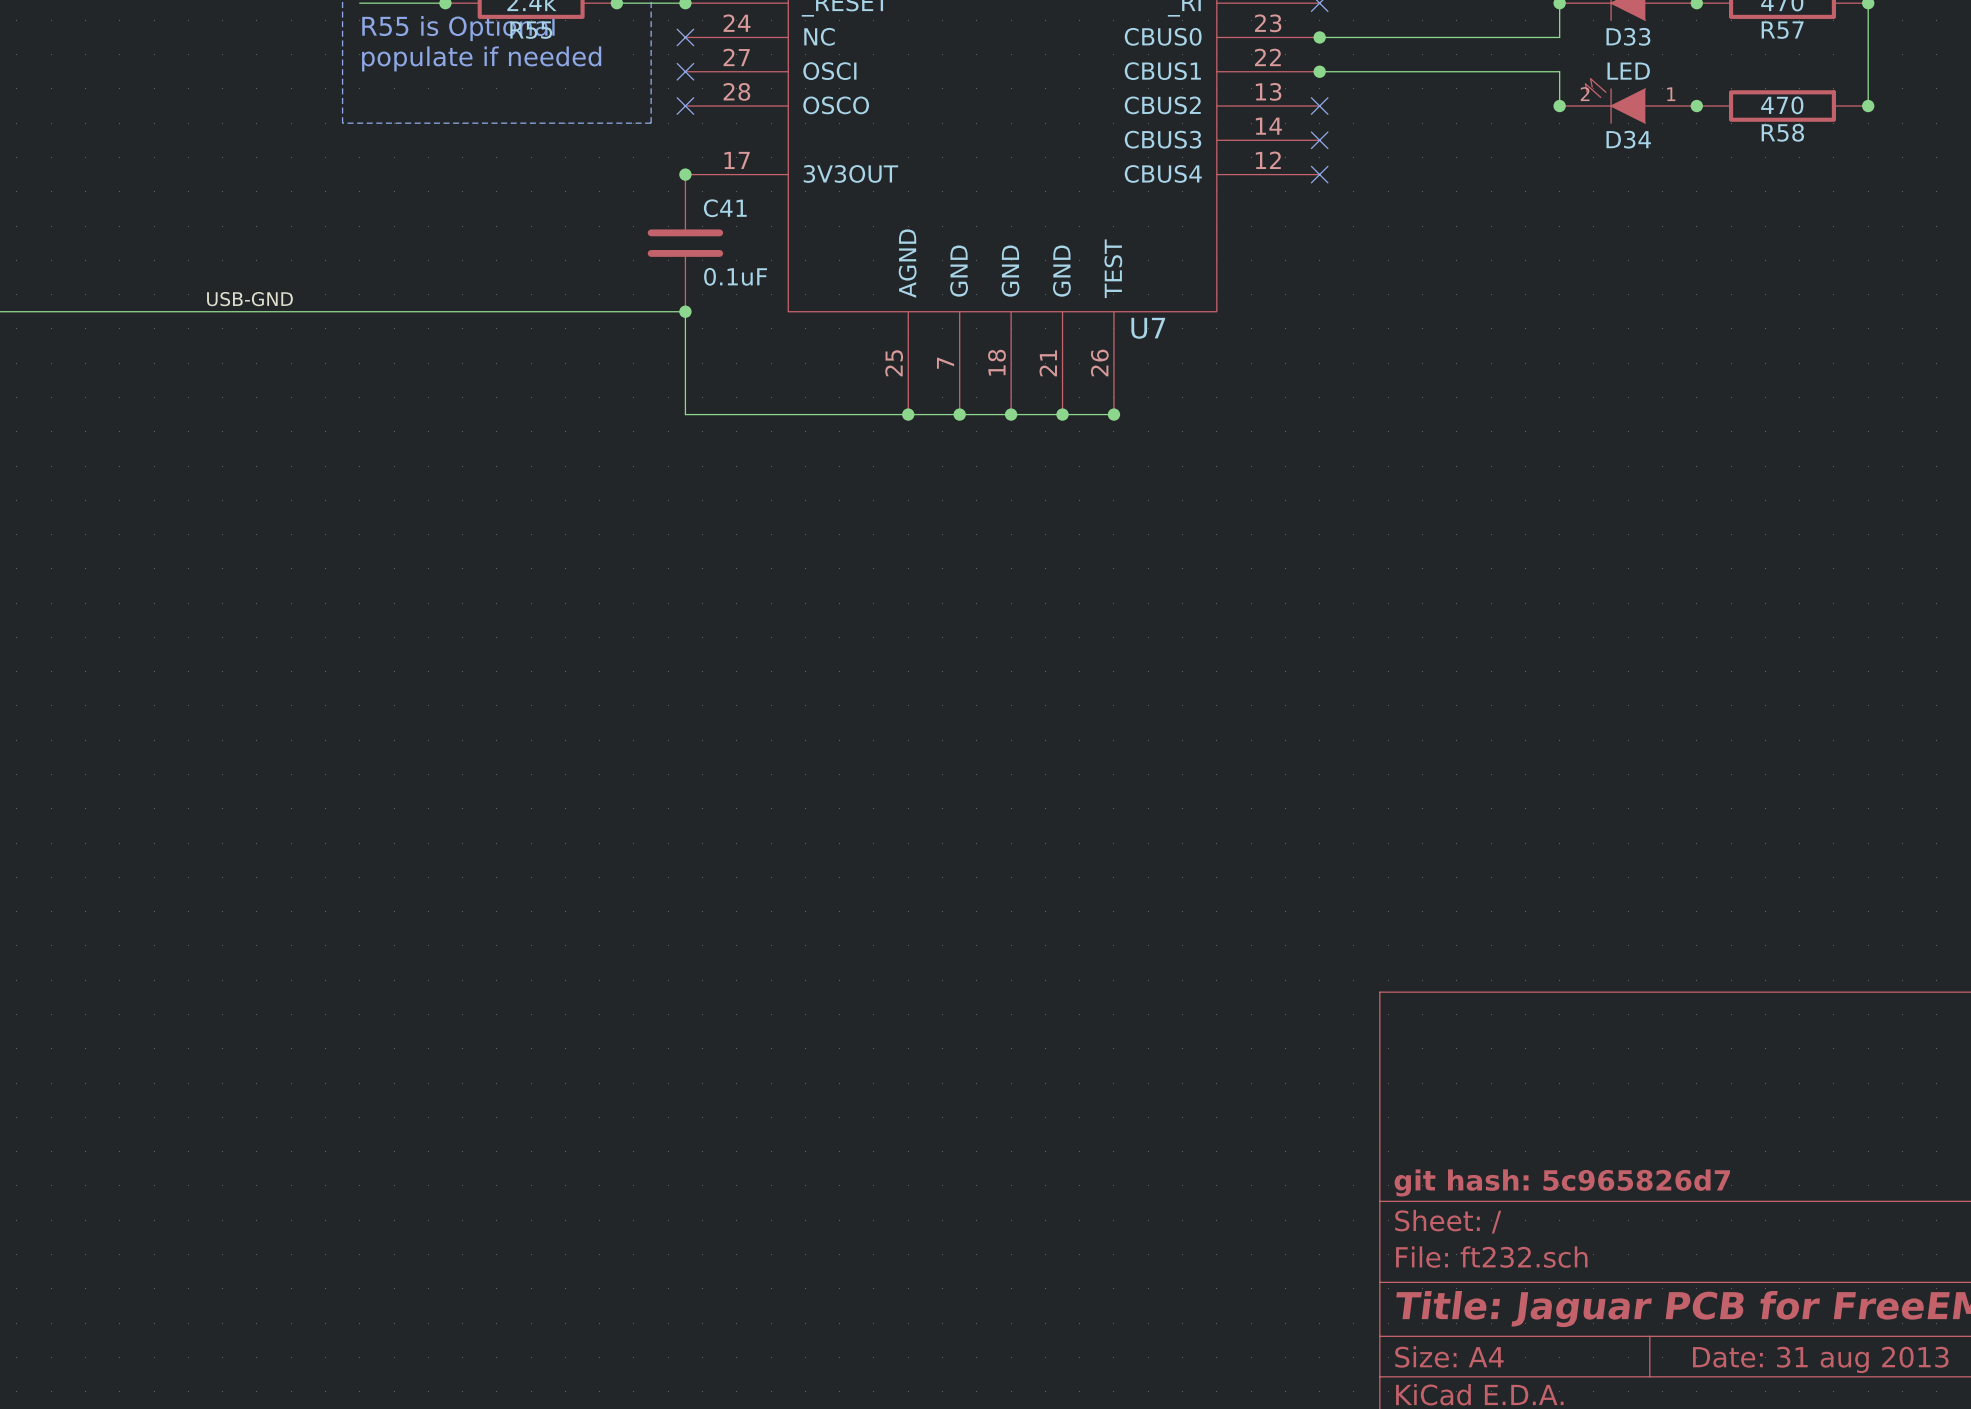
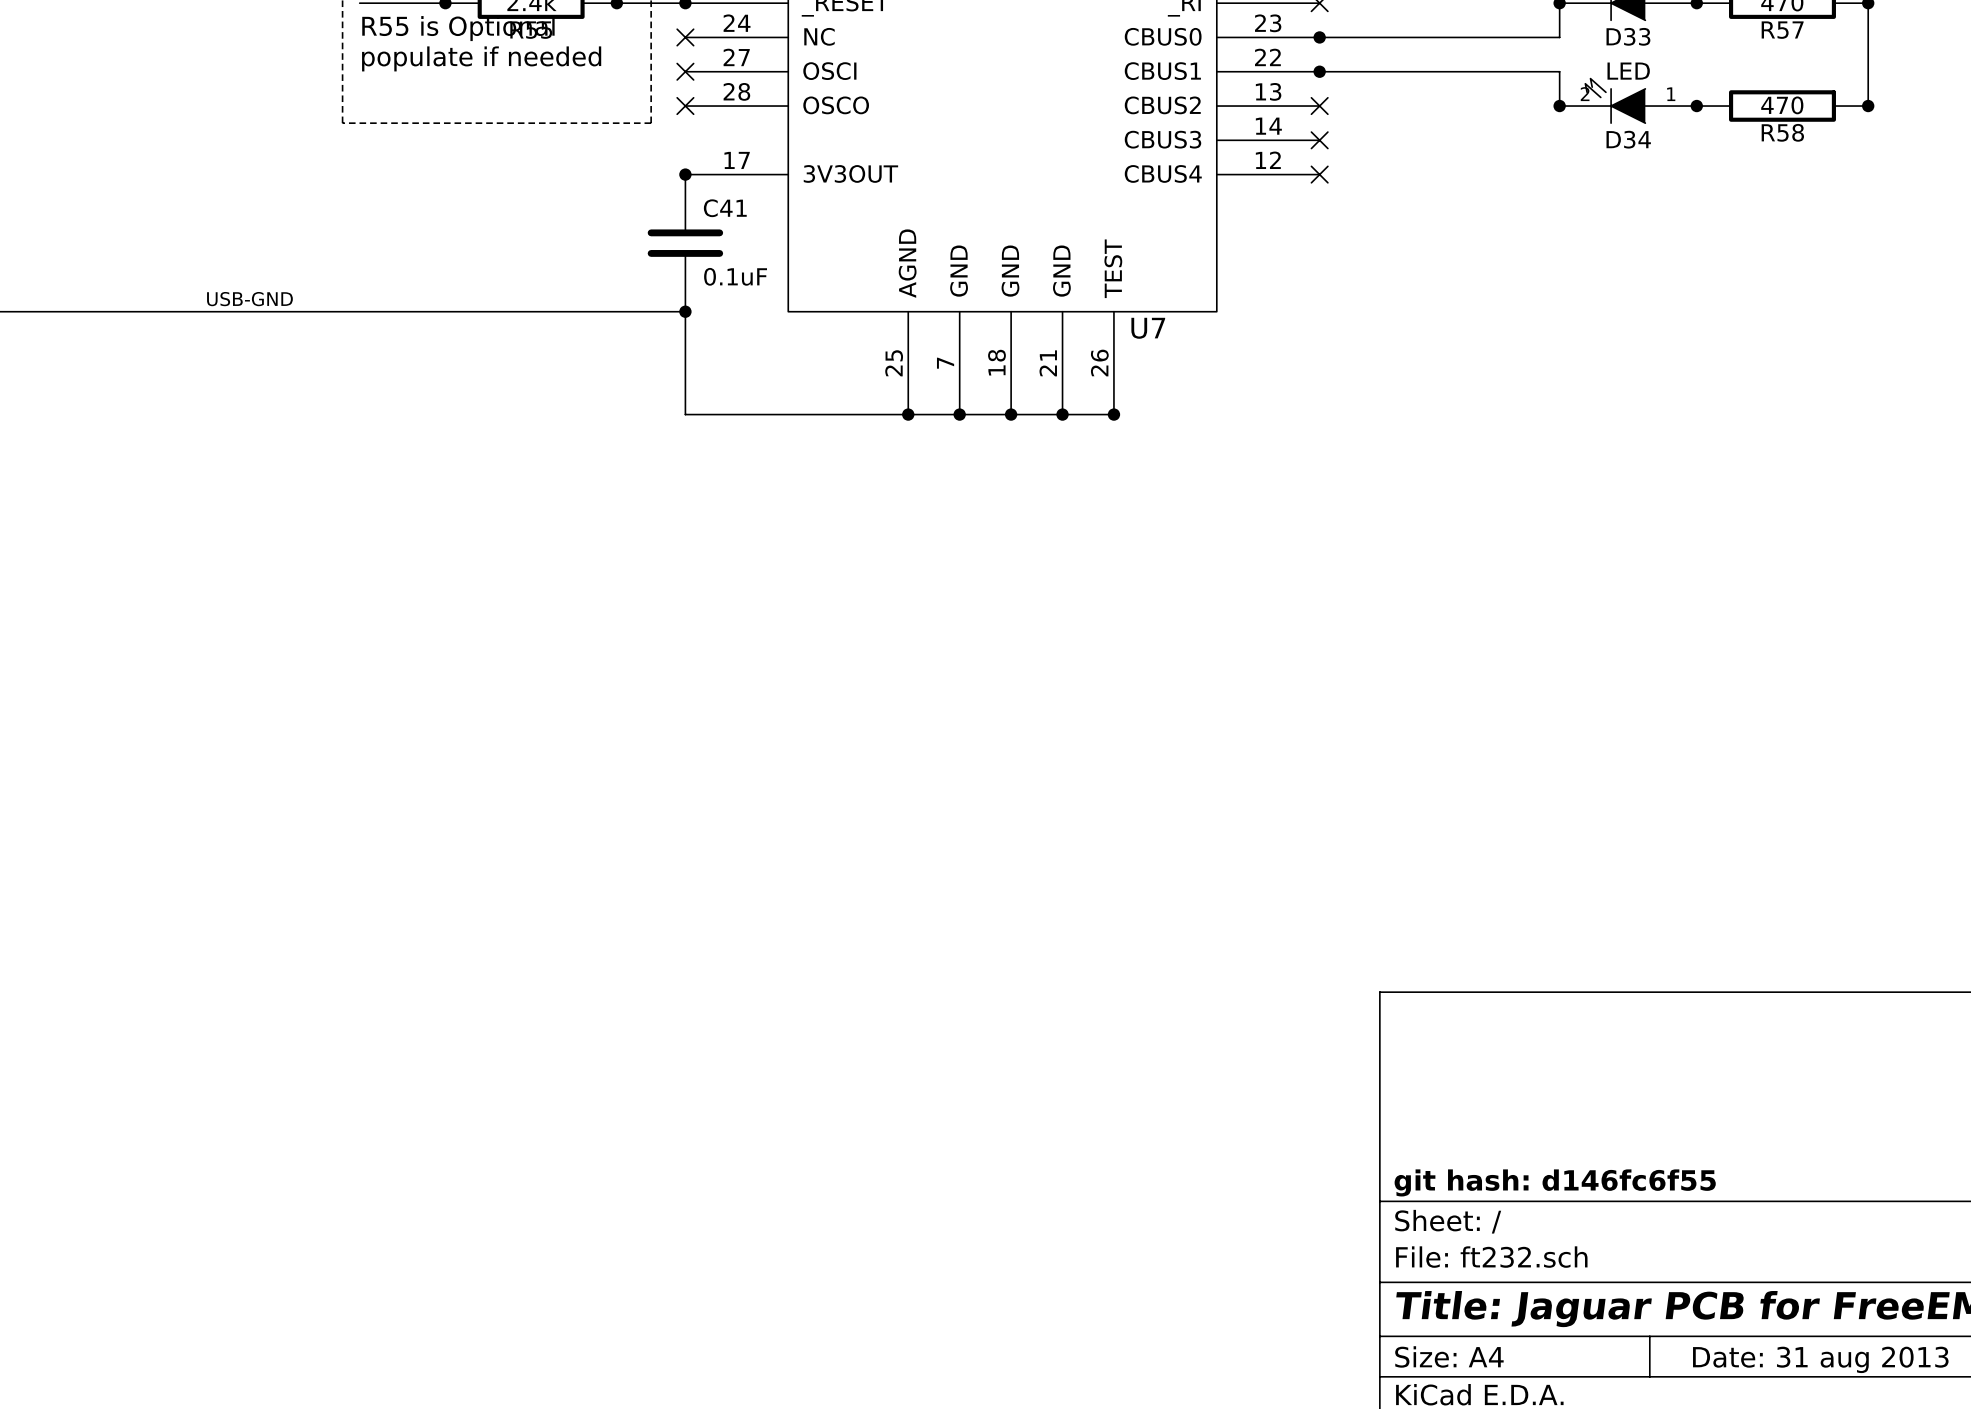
title block: git hash: 5c965826d7 (1562, 1182) -> git hash: d146fc6f55 (1555, 1182)

